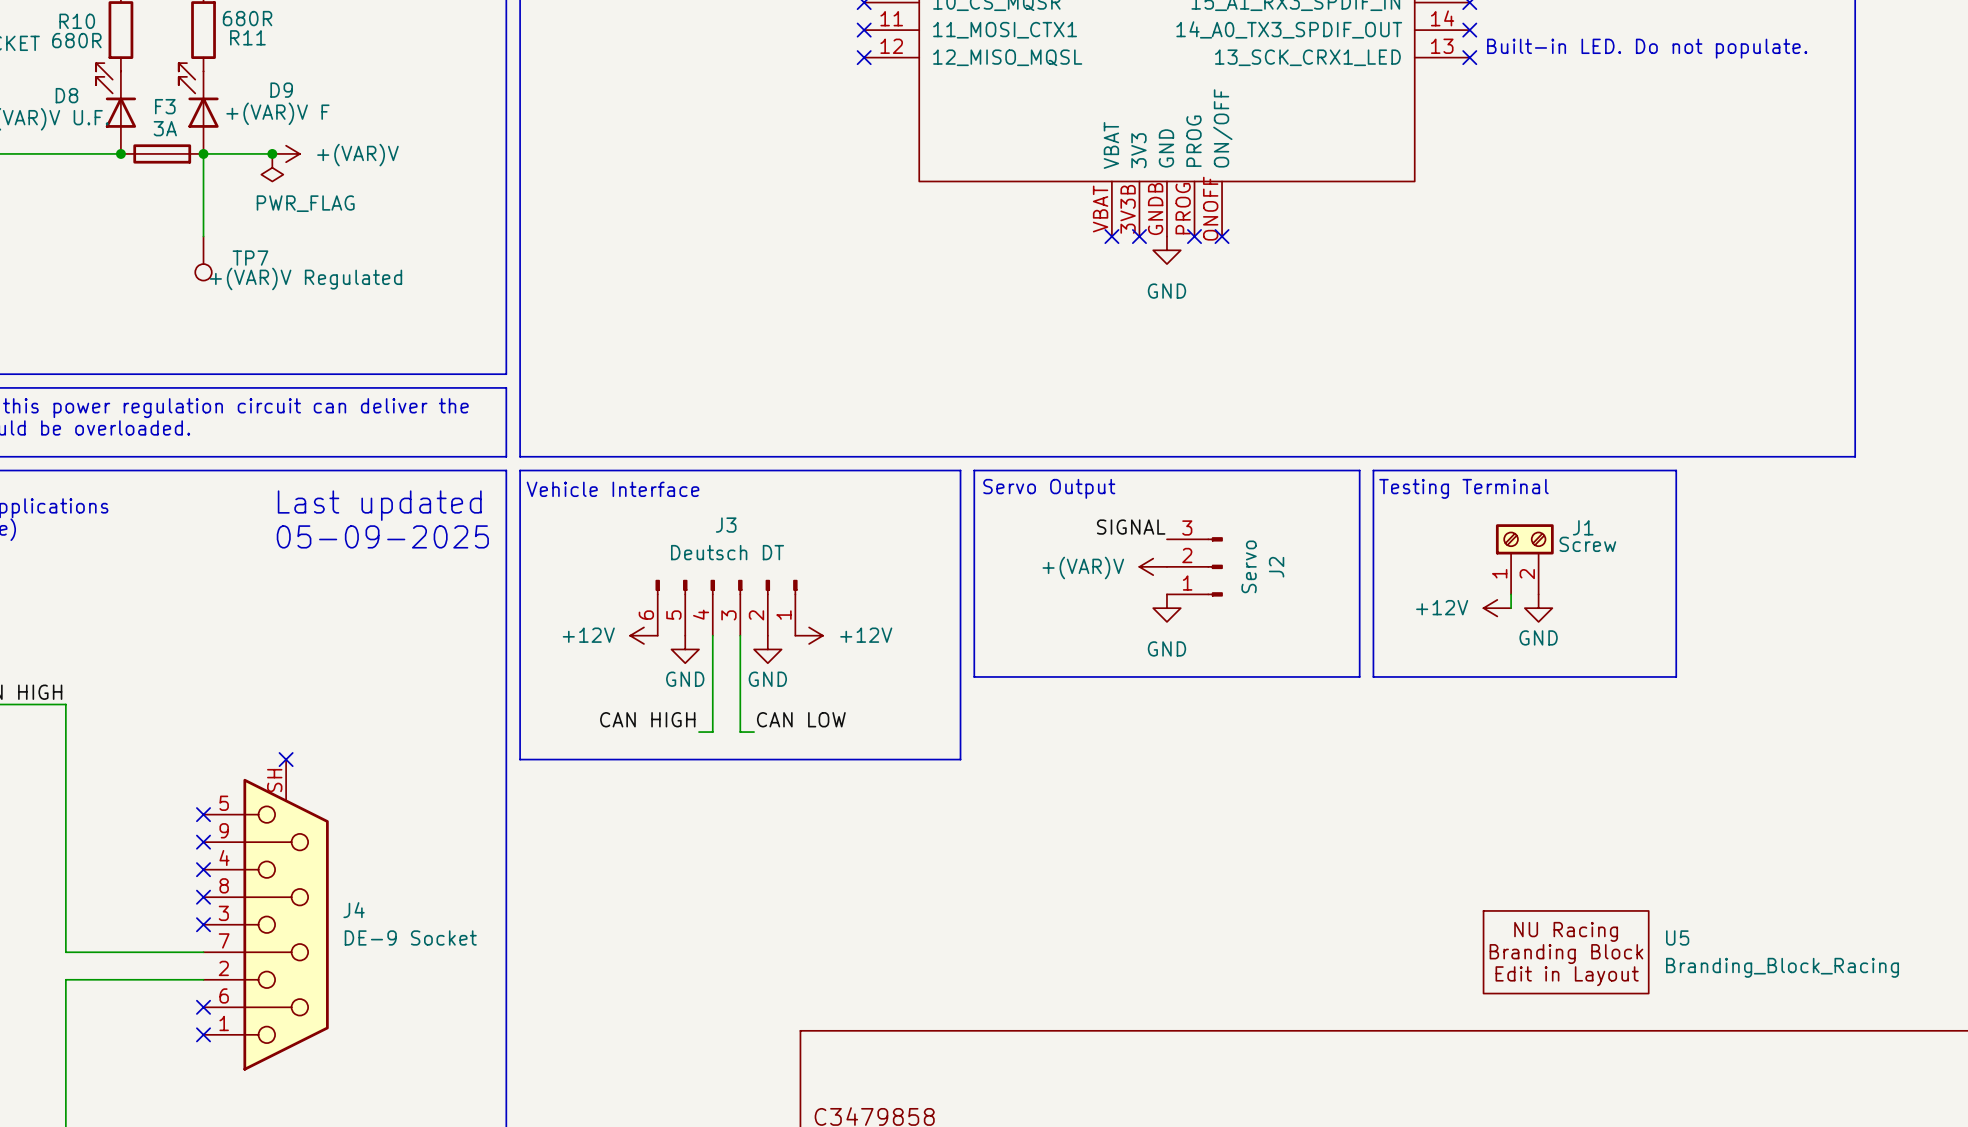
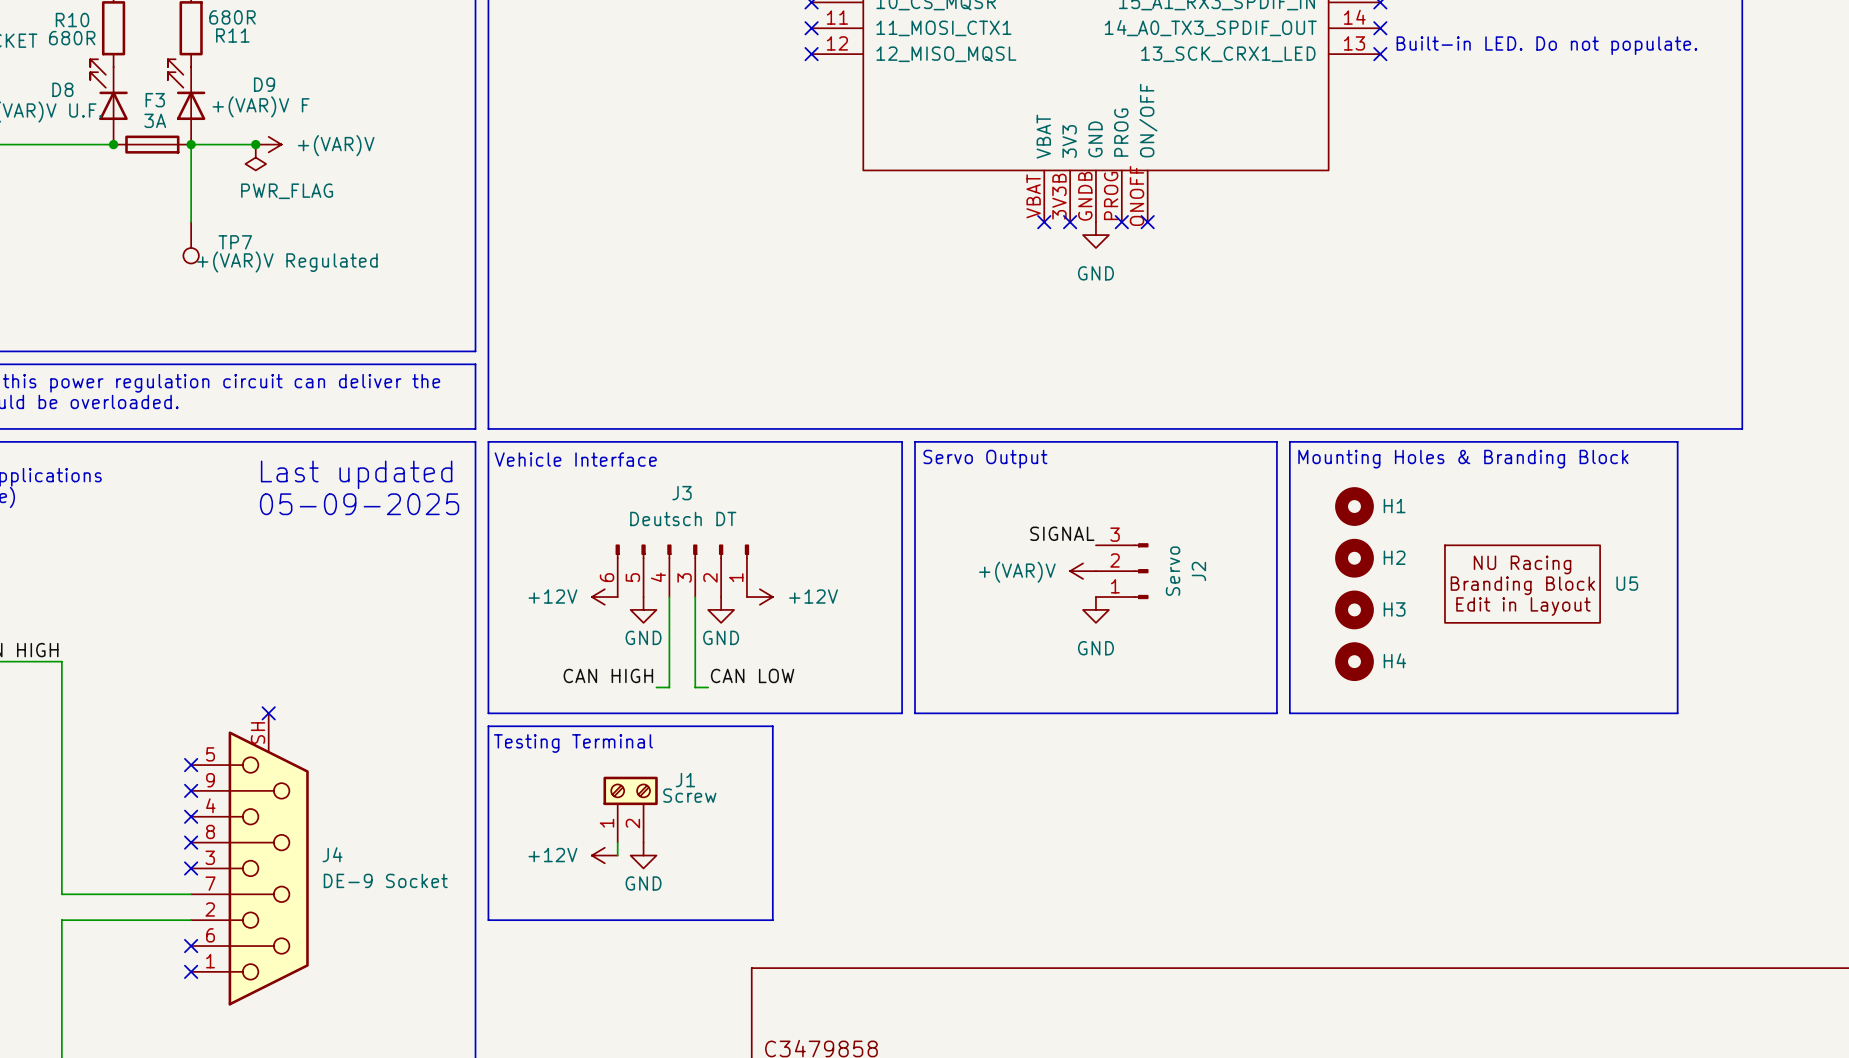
line: (1676, 470) (1676, 676) (1373, 676) -> (1574, 441) (1677, 441) (1677, 713) (1289, 713) (1289, 635)
text: Testing Terminal (1463, 488) -> none
text: none -> Mounting Holes & Branding Block (1463, 459)
label position: SIGNAL (1131, 527) -> SIGNAL (1062, 533)
H1: none -> (1354, 506)
J1 position: (1524, 559) -> (630, 809)
power symbol position: +(VAR)V (1153, 566) -> +(VAR)V (1083, 571)
J2 position: (1194, 566) -> (1122, 571)
H2: none -> (1354, 558)
wire: (1511, 594) (1511, 608) -> none
power symbol position: GND (1166, 608) -> GND (1095, 609)
power symbol: +12V (1497, 608) -> none
power symbol: GND (1538, 608) -> none
H3: none -> (1354, 609)
line: (974, 676) (1359, 676) -> (915, 635) (915, 713) (1276, 713) (1276, 635)
H4: none -> (1354, 661)
line: none -> (488, 726) (772, 726) (772, 920) (488, 920) (488, 726)
text: none -> Testing Terminal (573, 743)
wire: none -> (617, 842) (617, 855)
power symbol: none -> +12V (604, 855)
power symbol: none -> GND (643, 855)
U5 name position: U5 (1677, 937) -> U5 (1627, 583)
U5 position: (1566, 952) -> (1522, 584)
U5 value: Branding_Block_Racing (1782, 967) -> none

